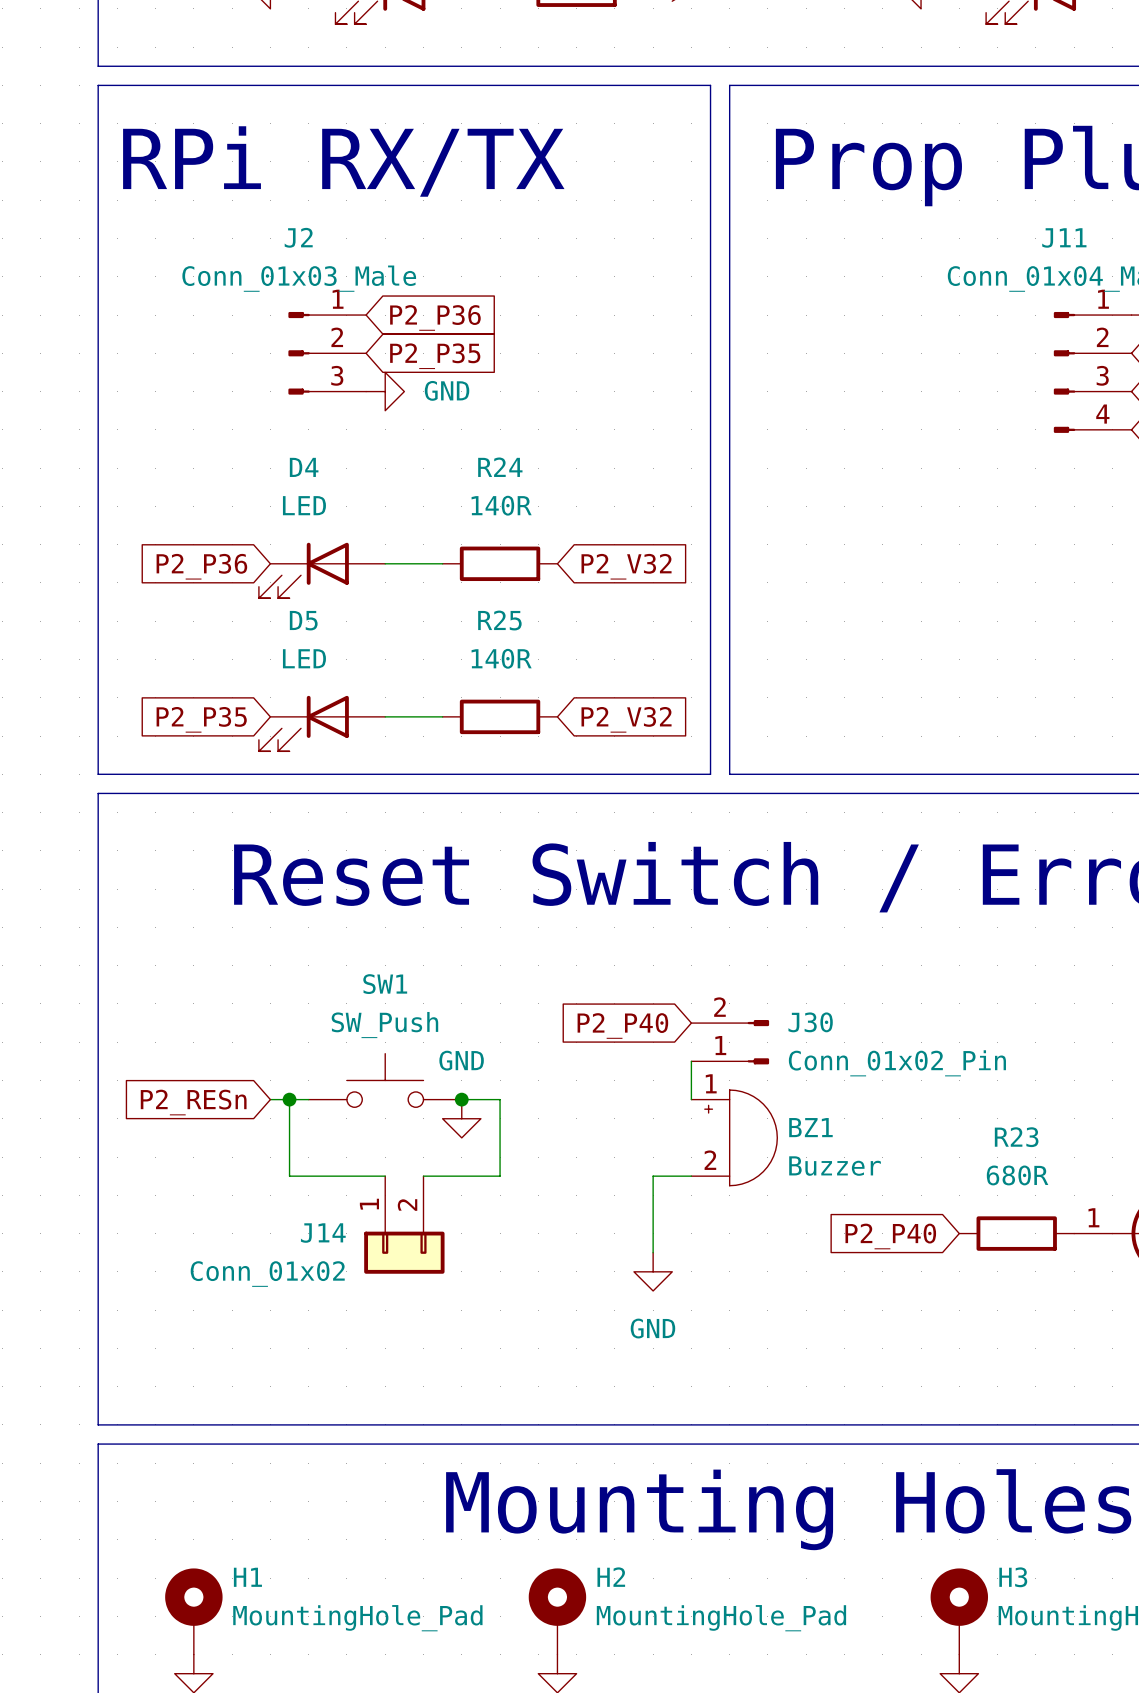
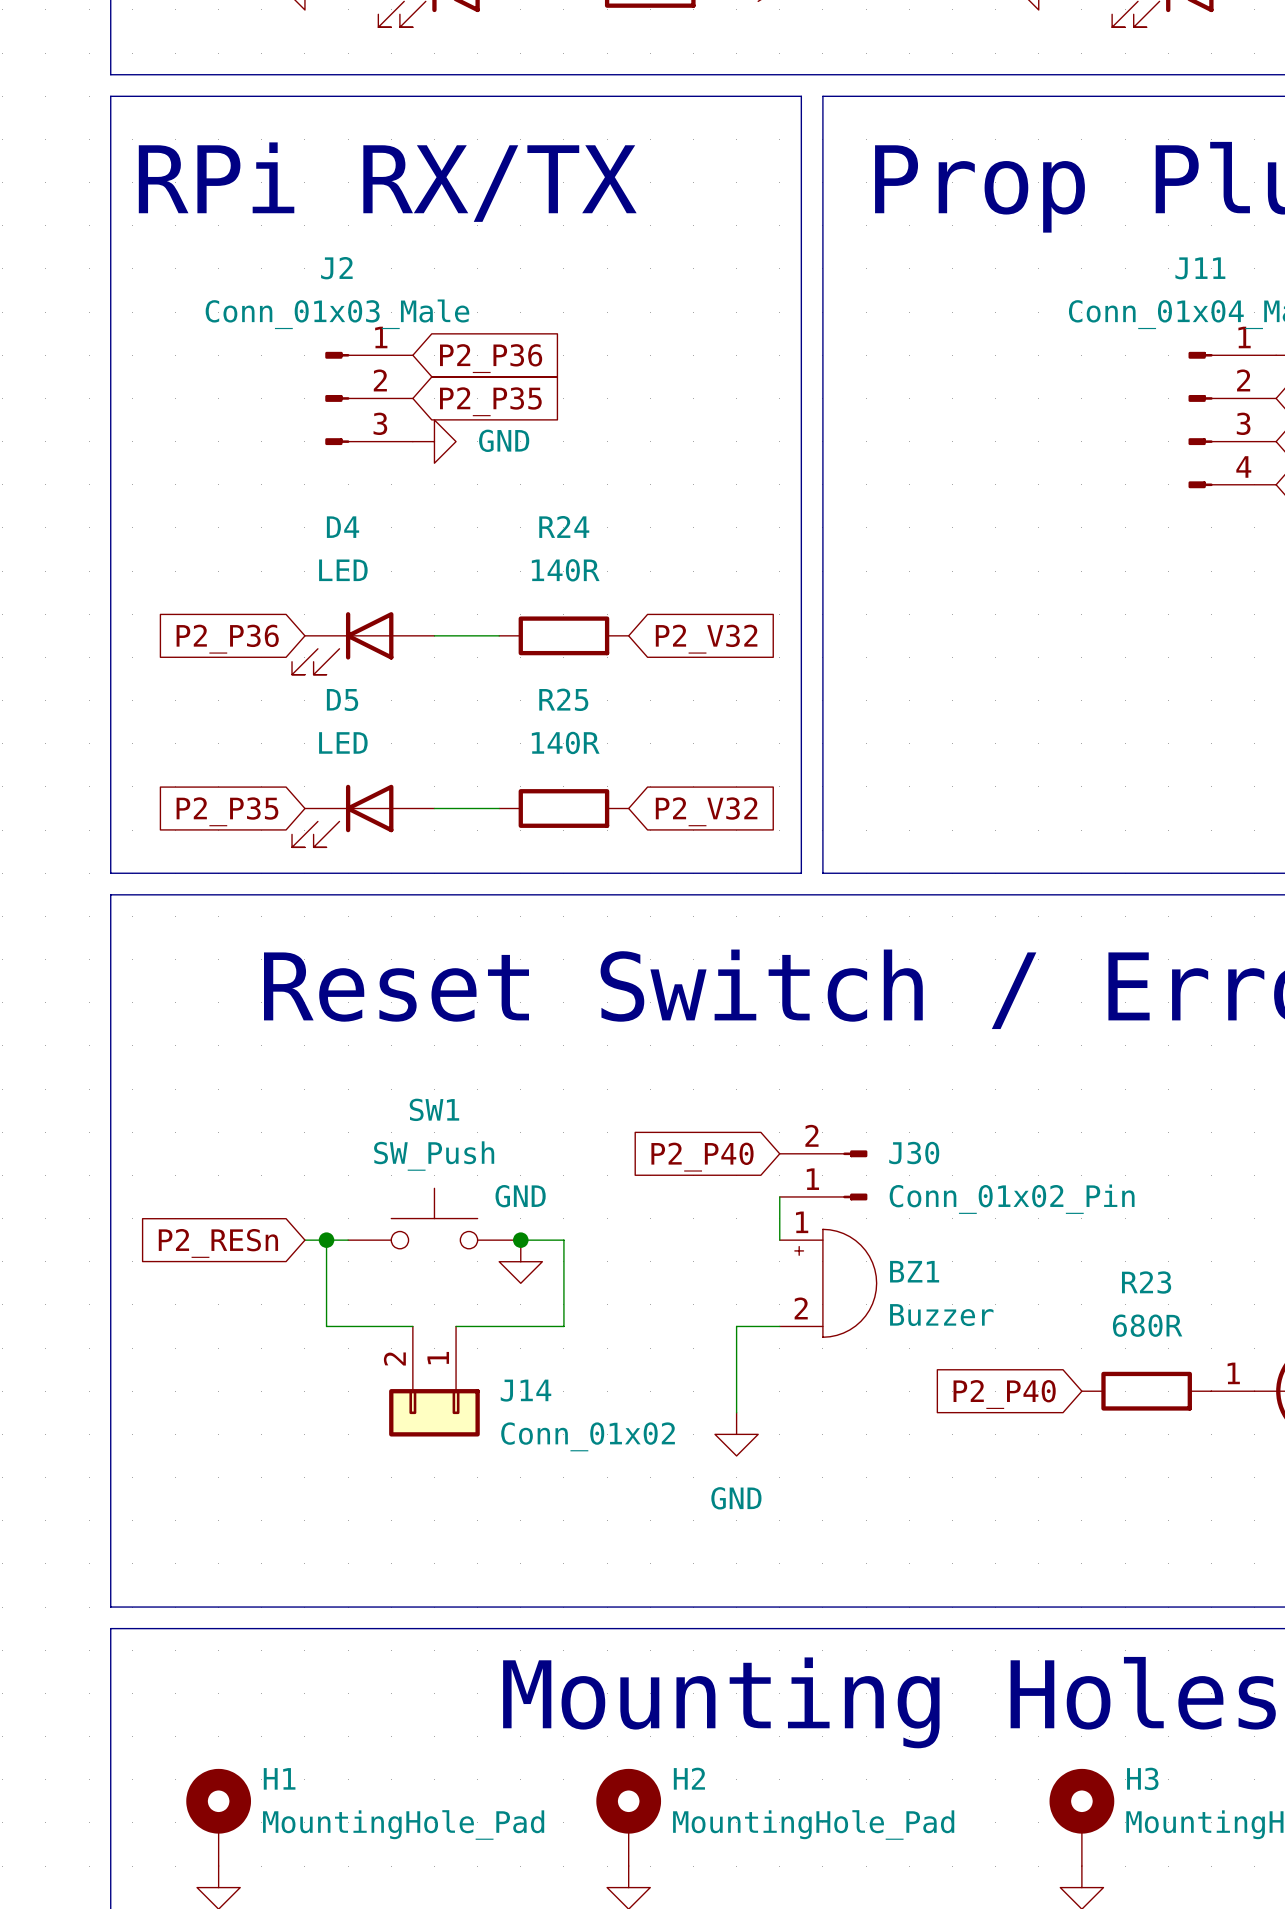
wire: (366, 1176) (385, 1176) -> (456, 1326) (477, 1326)
J14 flip: as is (404, 1252) -> left-right (434, 1412)

